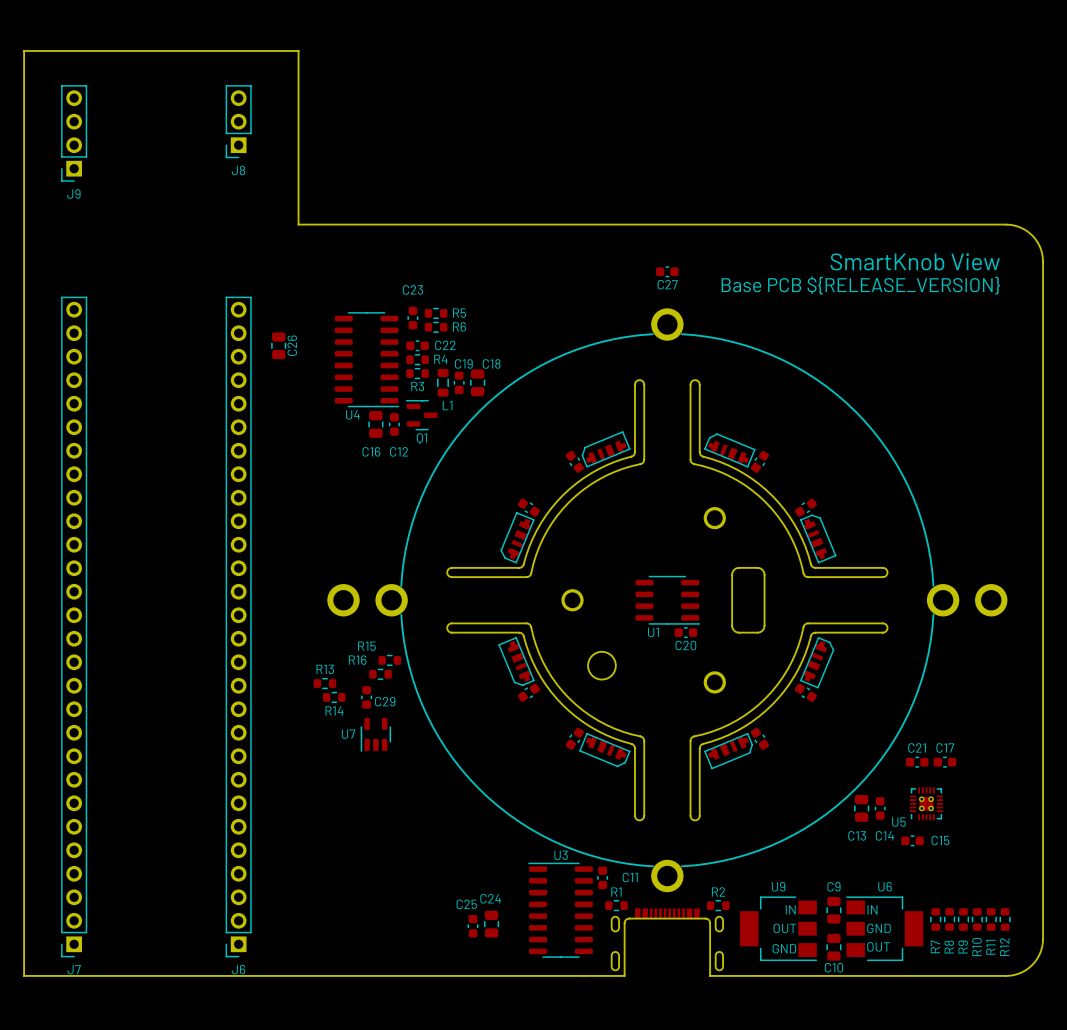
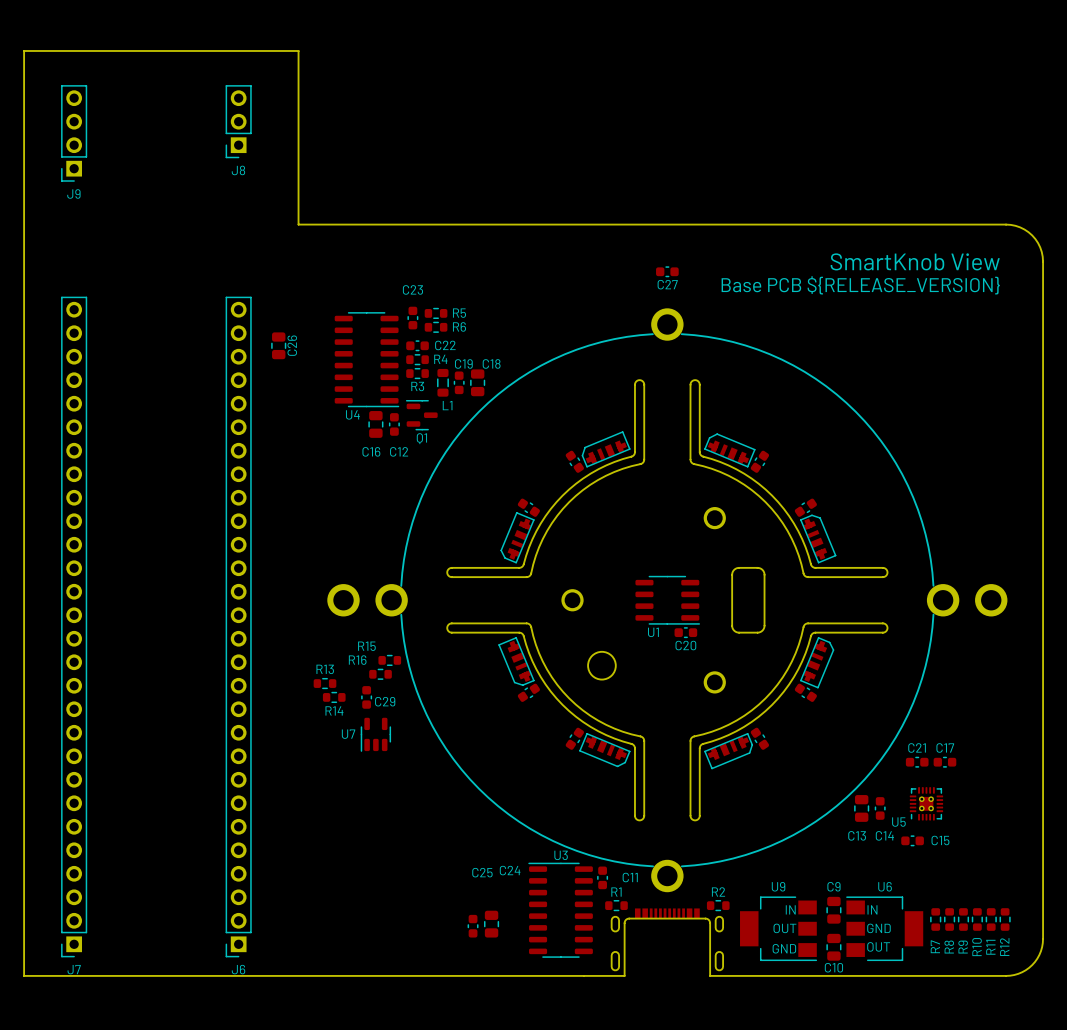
C24 name position: C24 (490, 898) -> C24 (510, 870)
C25 name position: C25 (466, 904) -> C25 (482, 872)

